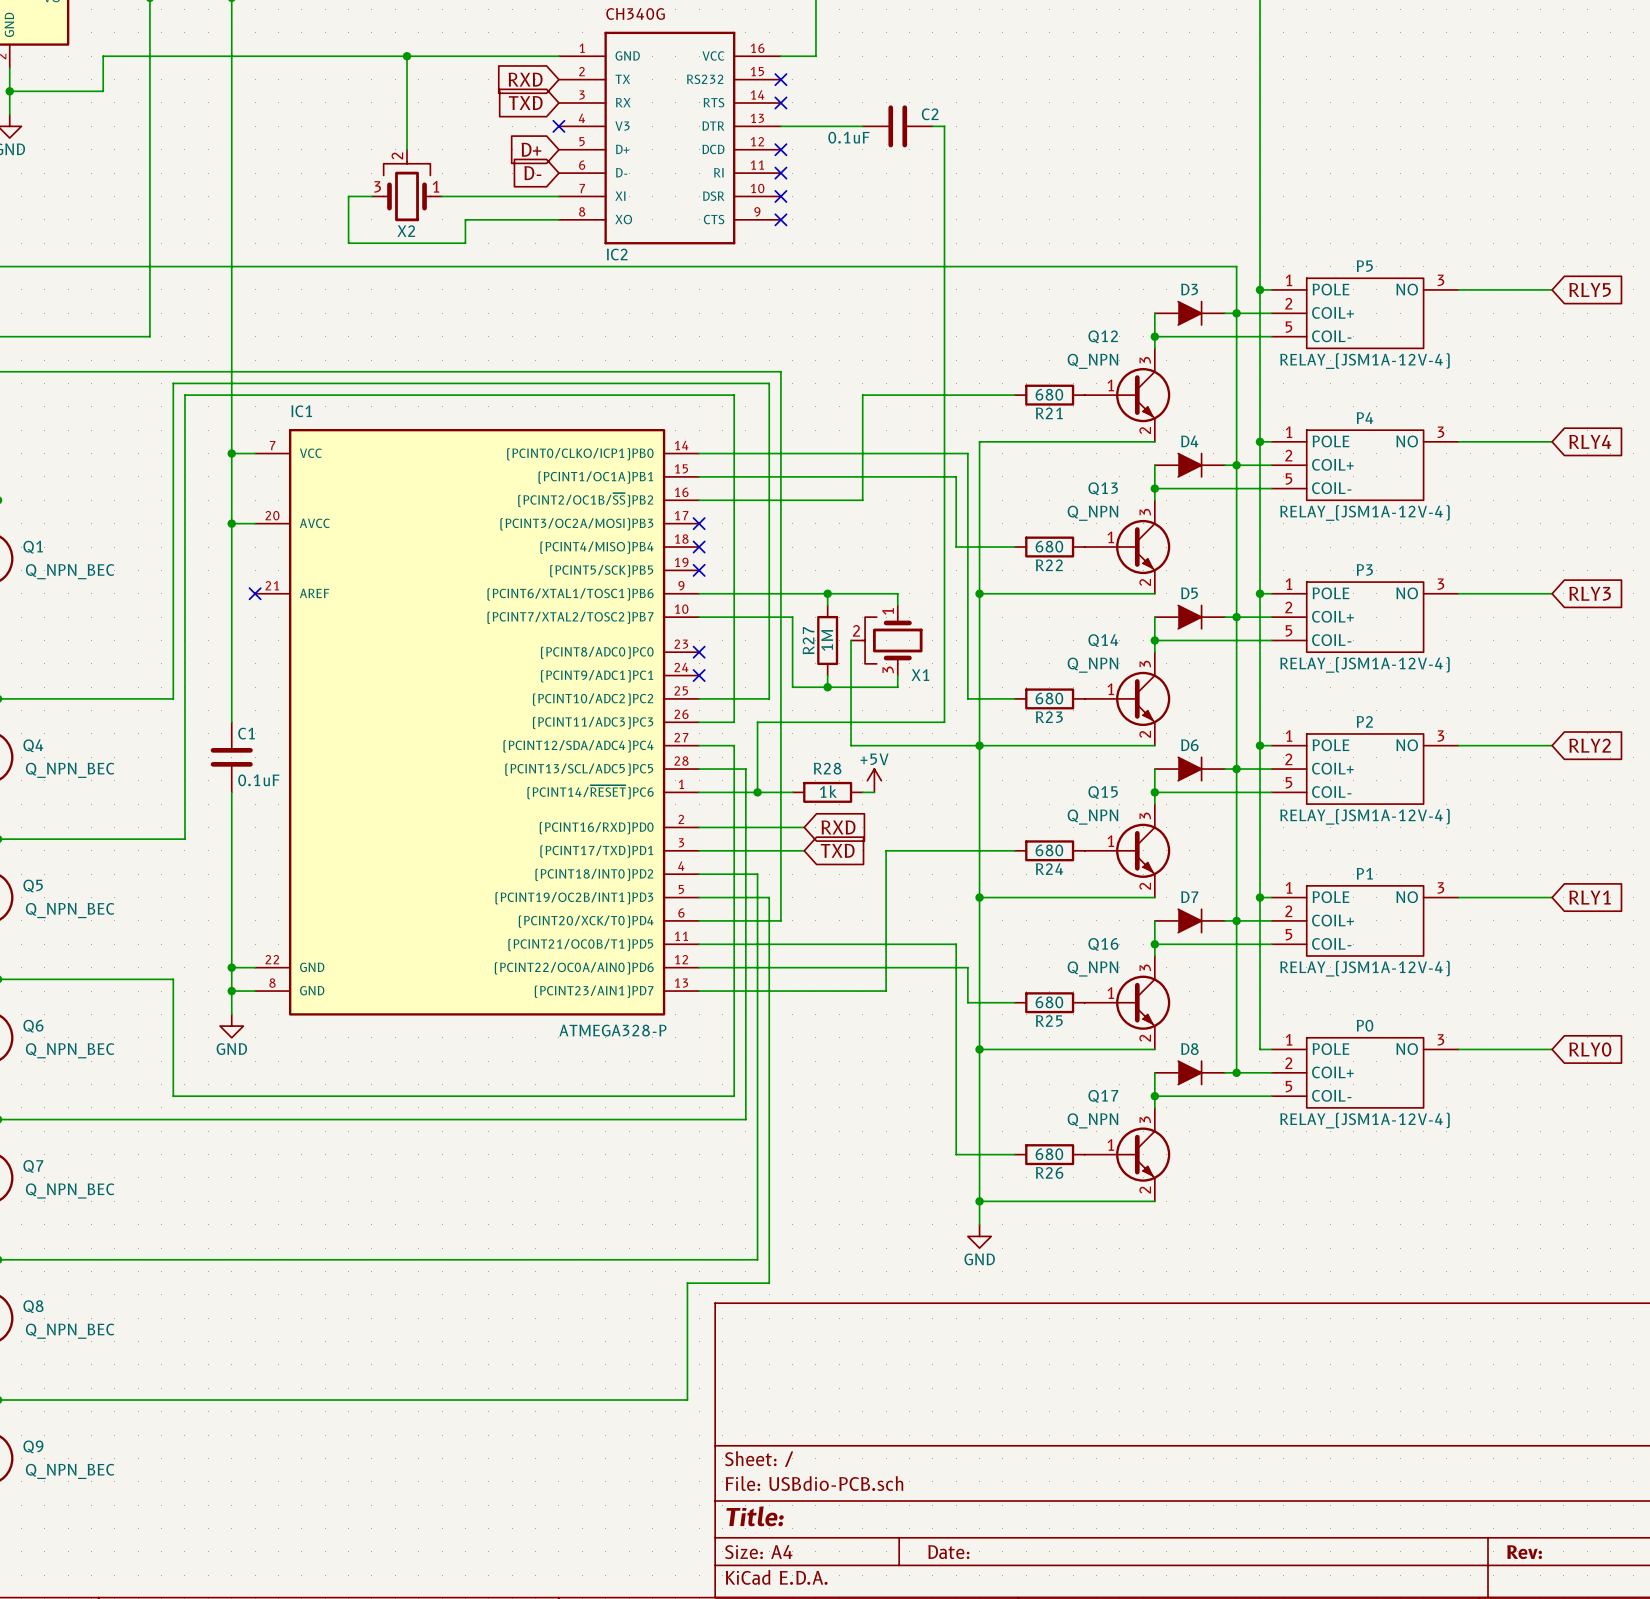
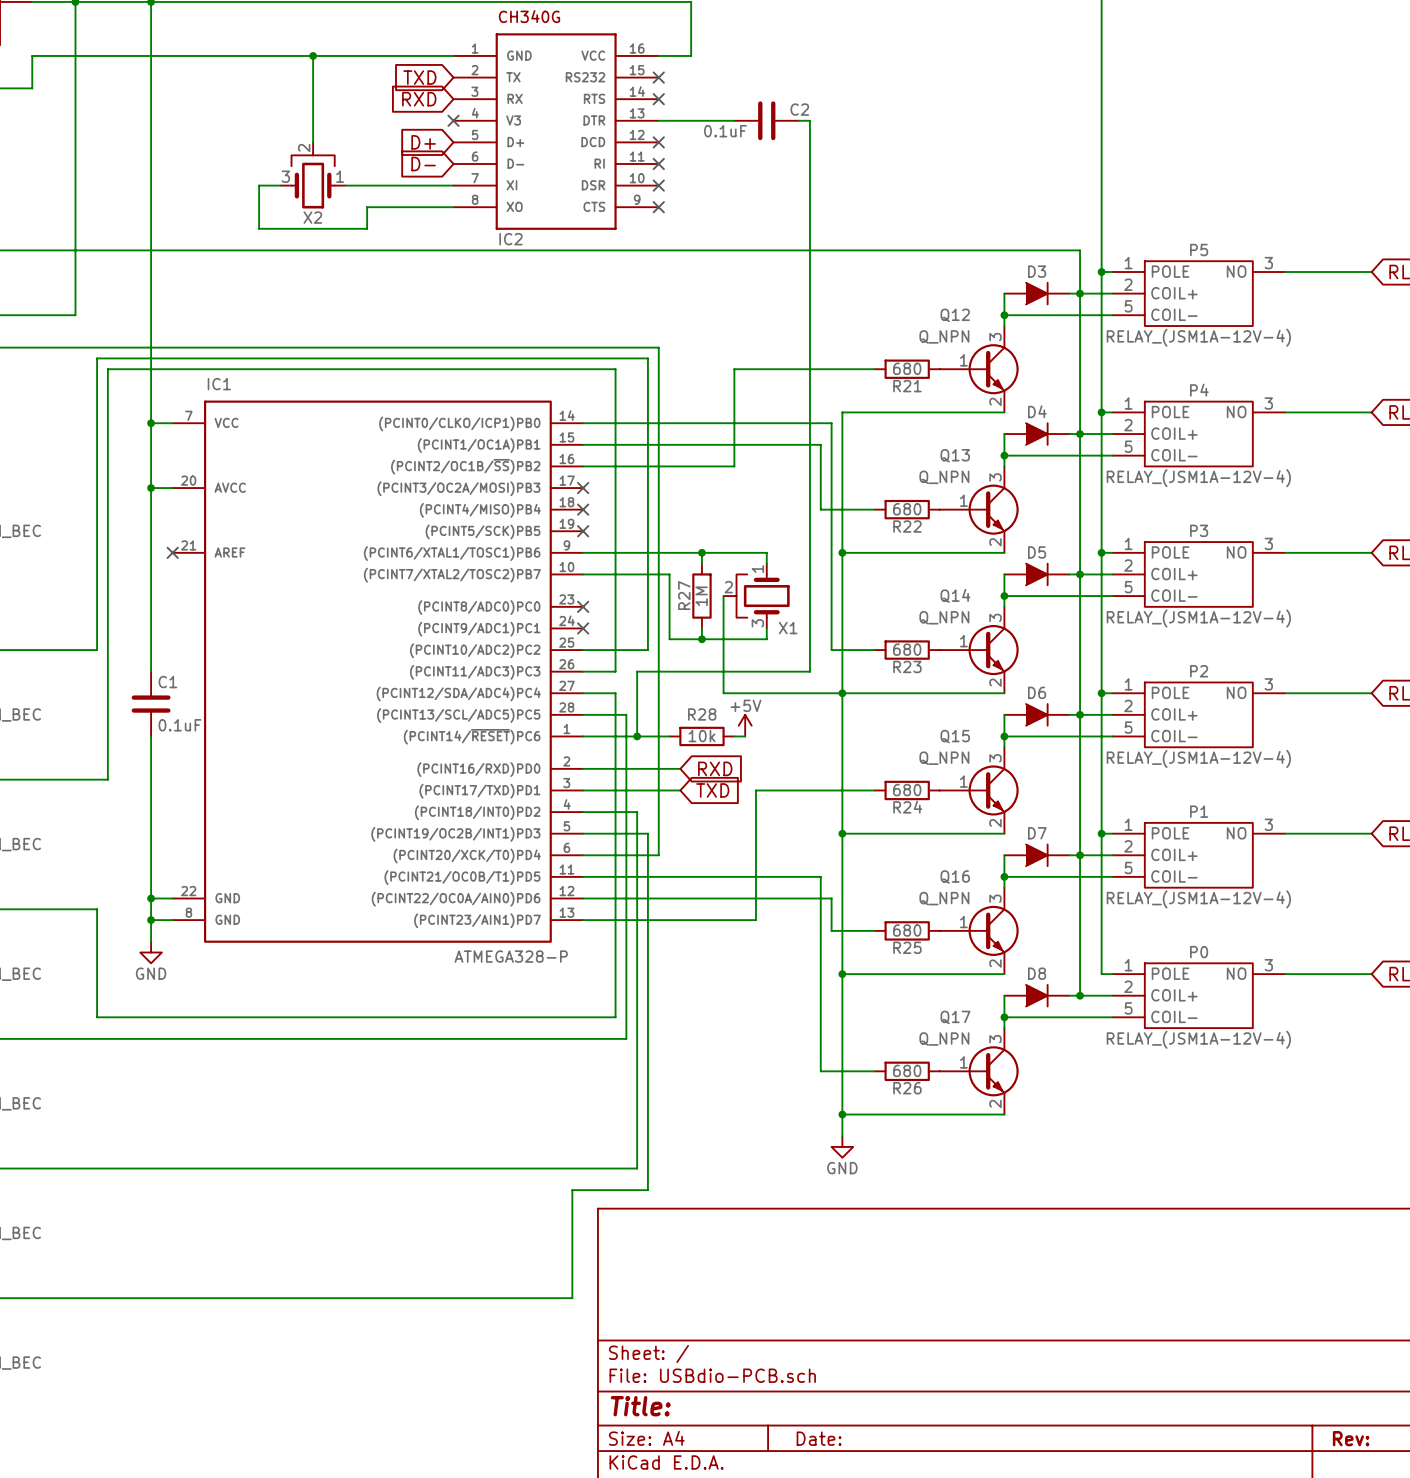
global label: RXD (525, 79) -> TXD (419, 77)
global label: TXD (525, 102) -> RXD (419, 99)
R28 value: 1k (828, 791) -> 10k (701, 736)

